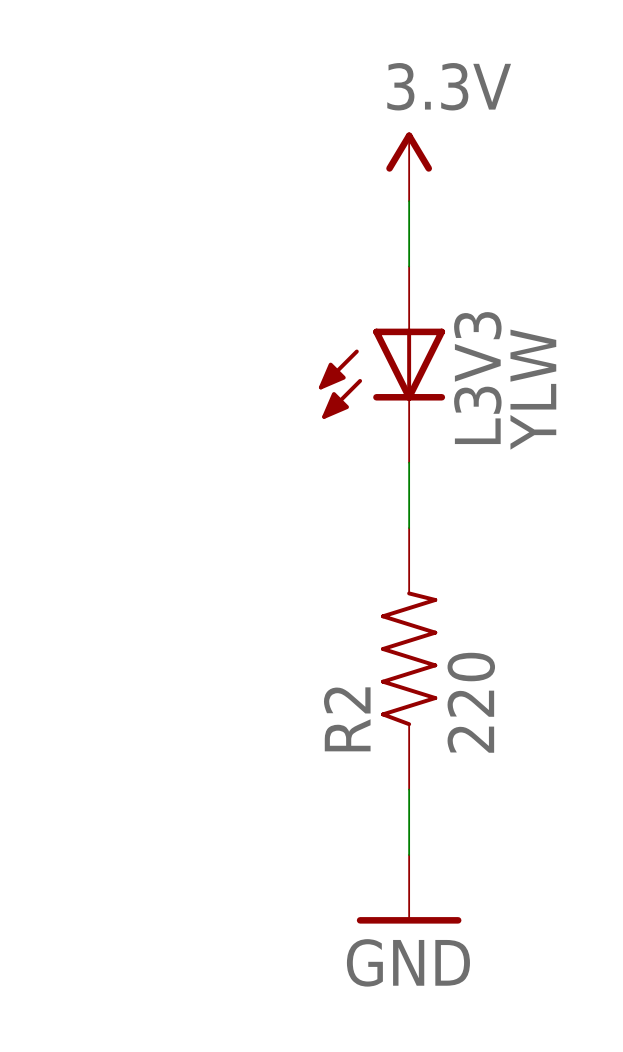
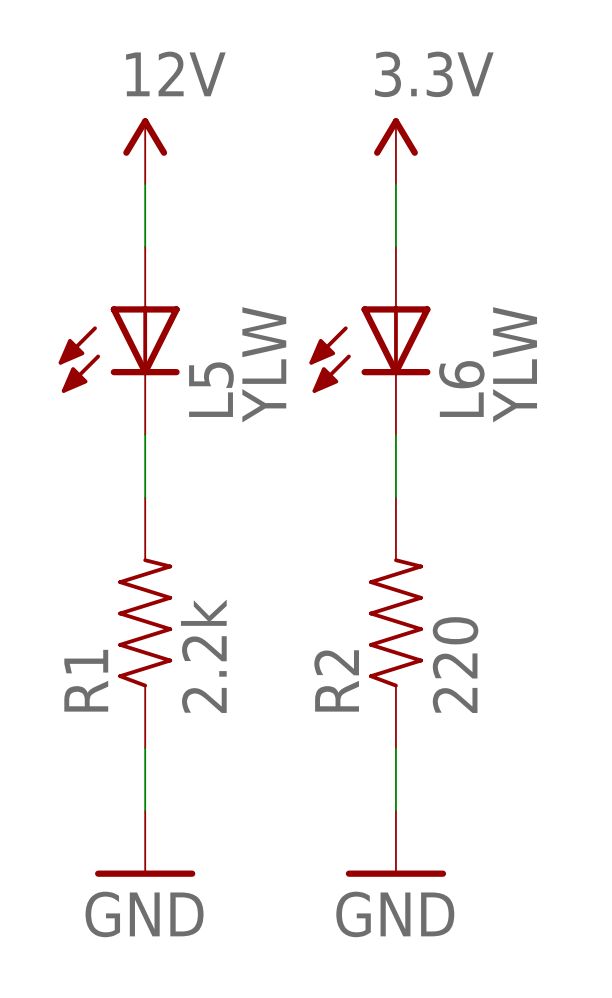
power symbol: none -> 12V (145, 151)
wire: none -> (145, 184) (145, 246)
L5: none -> YLW (119, 340)
L3V3 name: L3V3 (477, 378) -> L6 (461, 389)
wire: none -> (145, 434) (145, 497)
R1: none -> 2.2k (145, 622)
wire: none -> (145, 748) (145, 810)
power symbol: none -> GND (145, 843)

